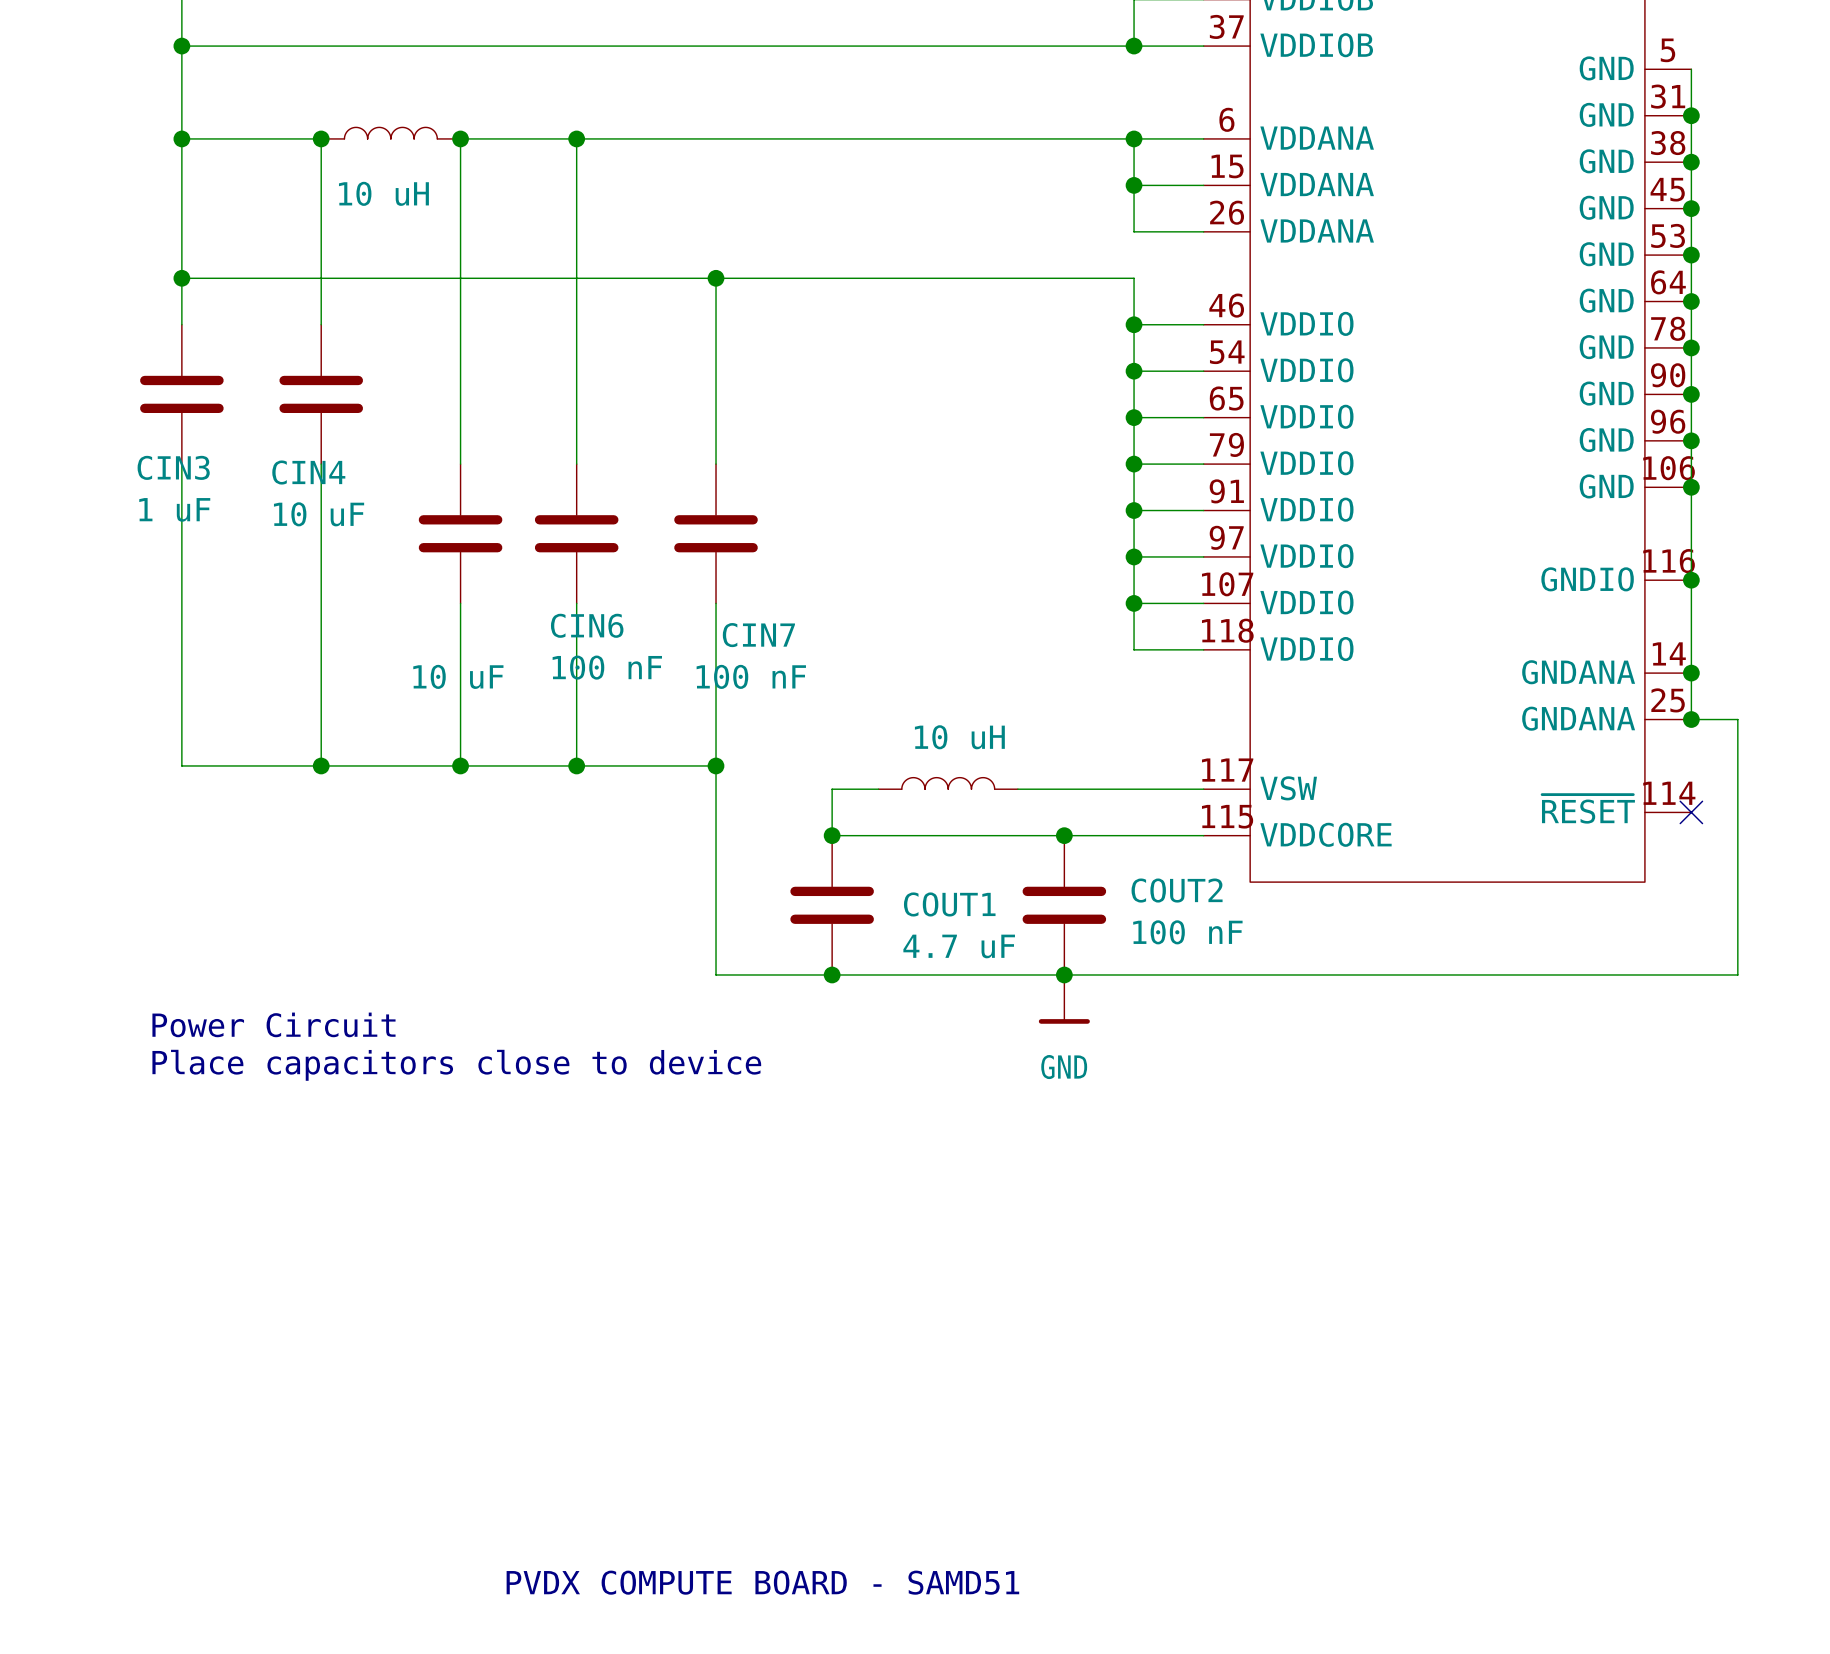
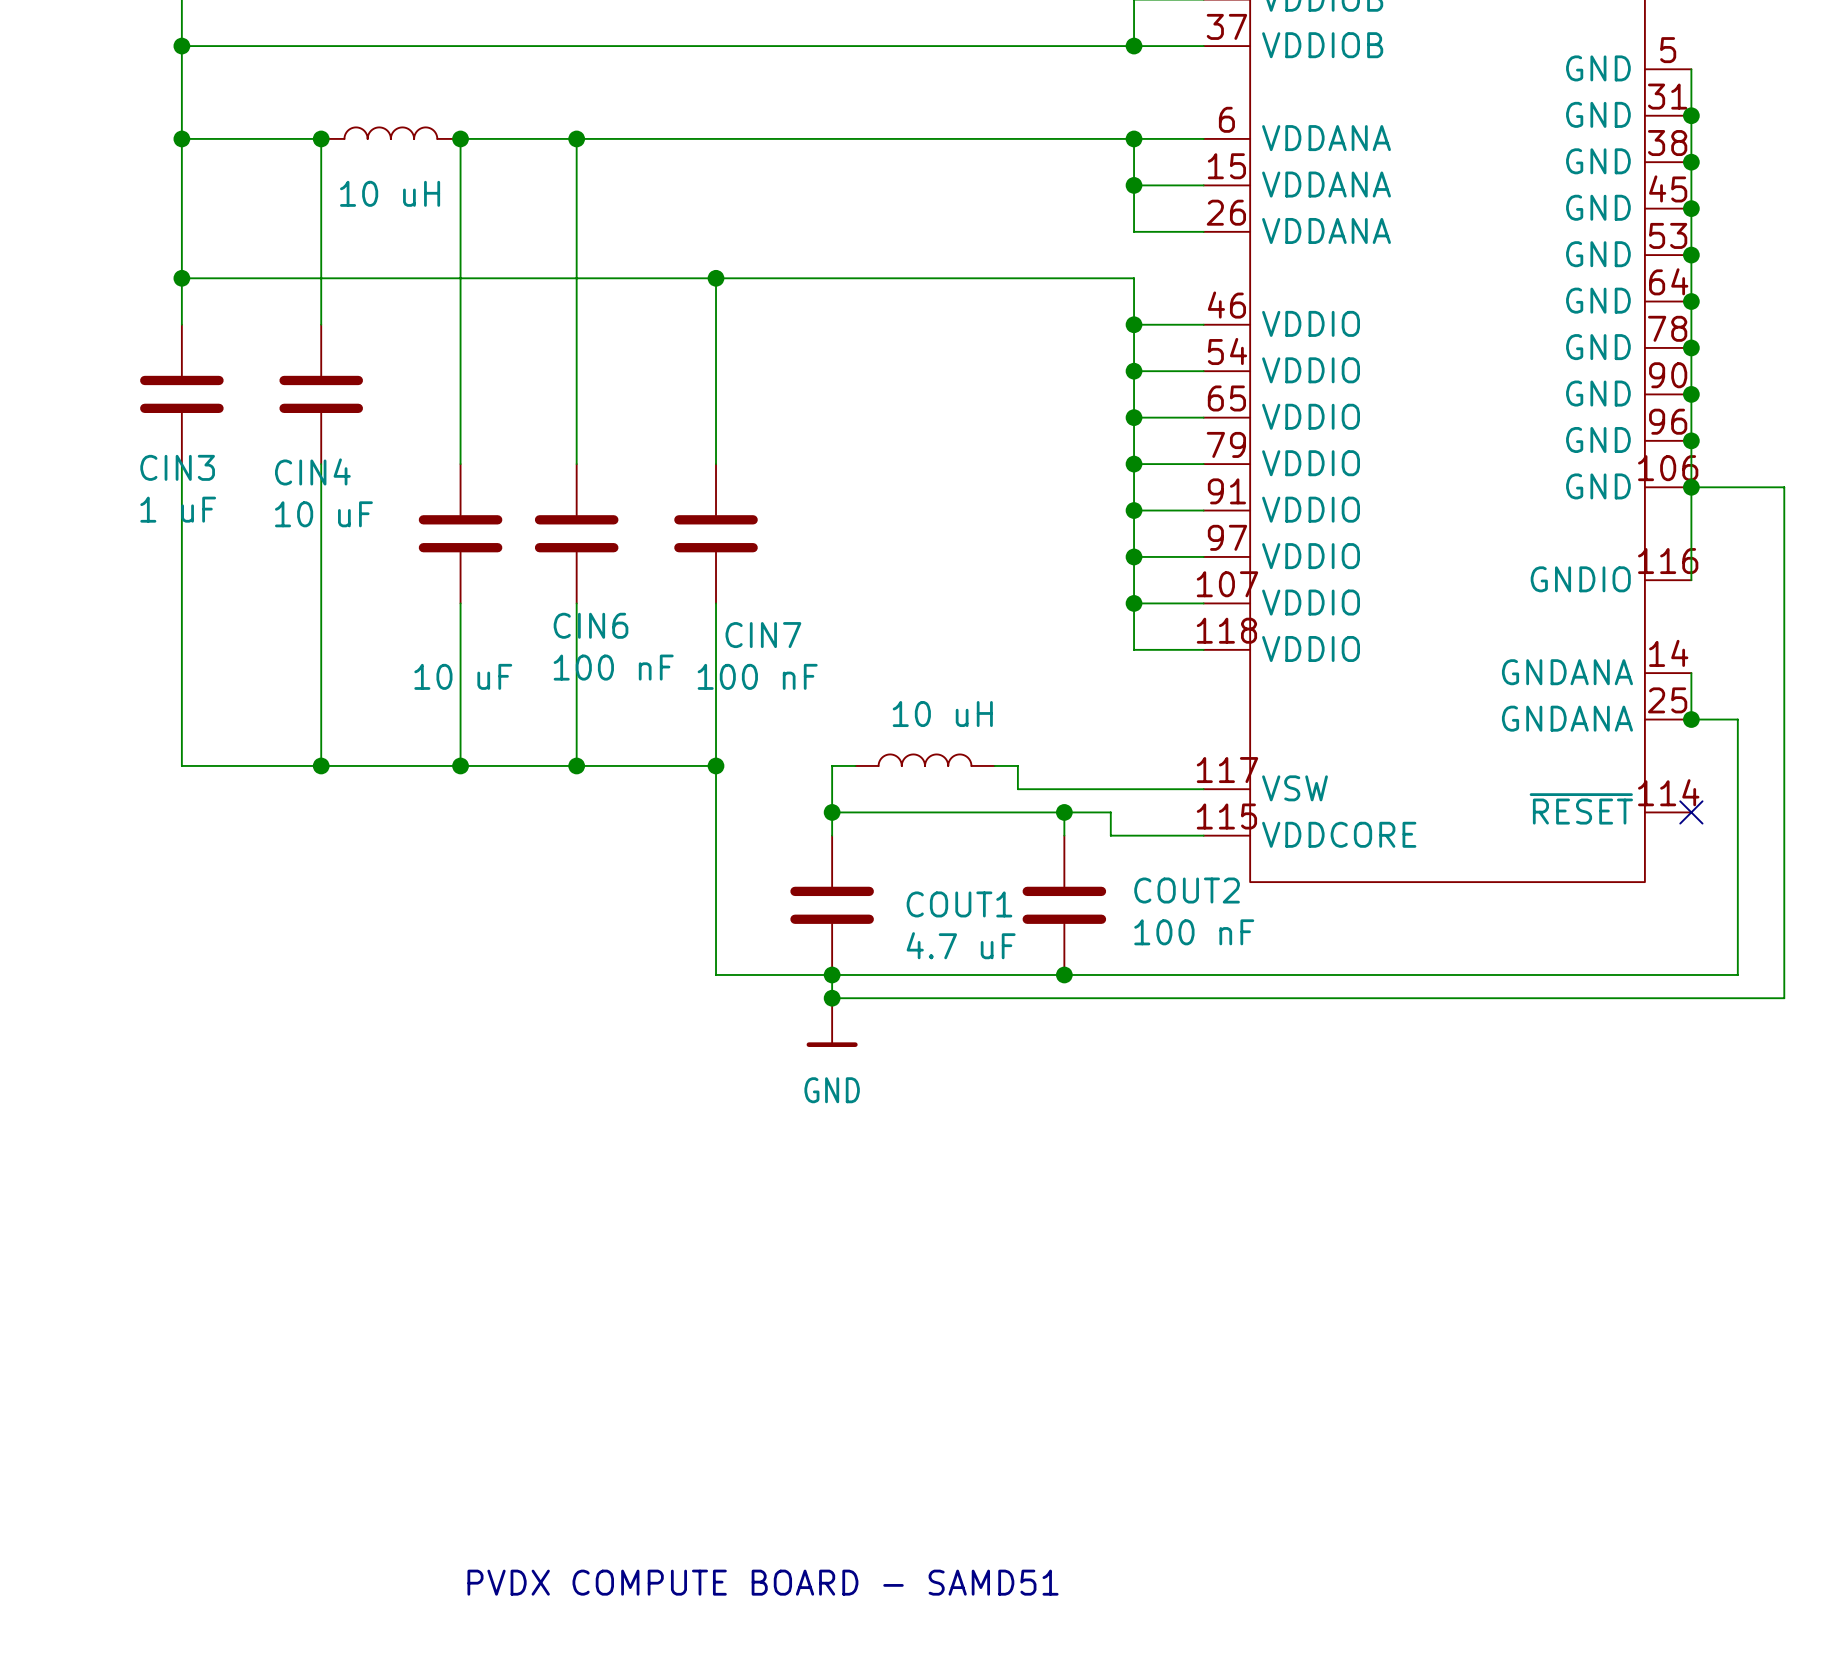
wire: none -> (1691, 487) (1784, 487) (1784, 998) (832, 998) (832, 974)
wire: (1691, 580) (1691, 673) -> none
junction: (1691, 580) -> none
junction: (1691, 673) -> none
wire: none -> (994, 765) (1017, 765) (1017, 789)
part position: (948, 783) -> (925, 760)
wire: (832, 789) (878, 789) -> (832, 789) (832, 765) (855, 765)
wire: none -> (1064, 812) (1064, 835)
wire: (832, 835) (1110, 835) -> (832, 812) (1110, 812) (1110, 835)
junction position: (832, 835) -> (832, 812)
junction position: (1064, 835) -> (1064, 812)
junction: none -> (832, 998)
power symbol position: GND (1064, 999) -> GND (832, 1022)
text: Power Circuit (273, 1024) -> none
text: Place capacitors close to device (456, 1065) -> none

